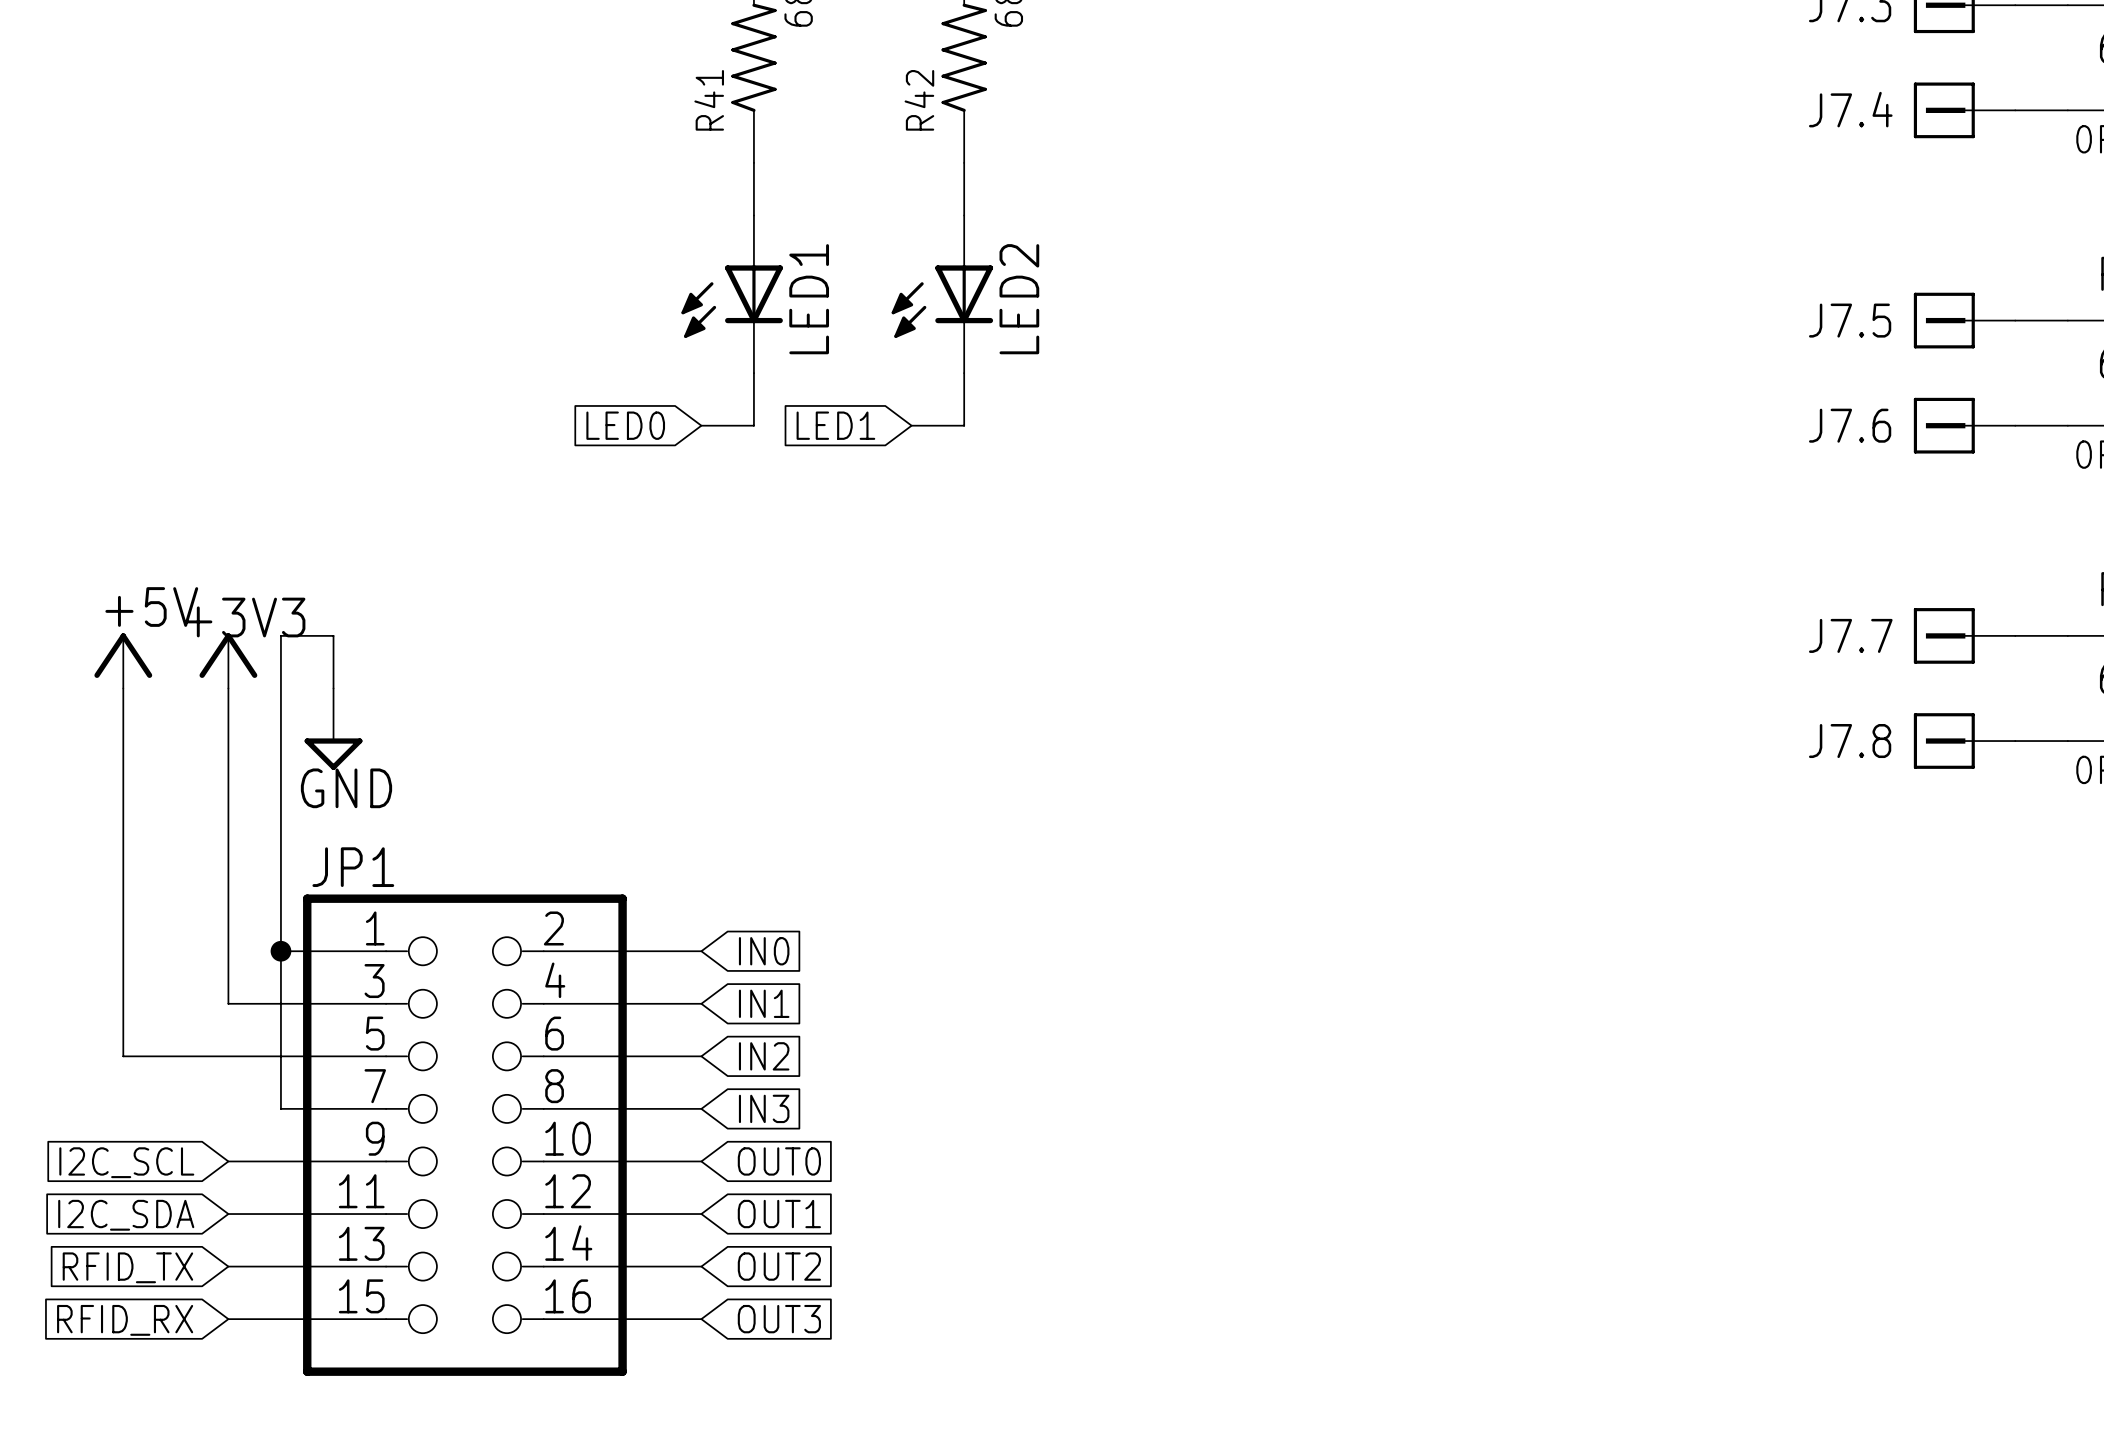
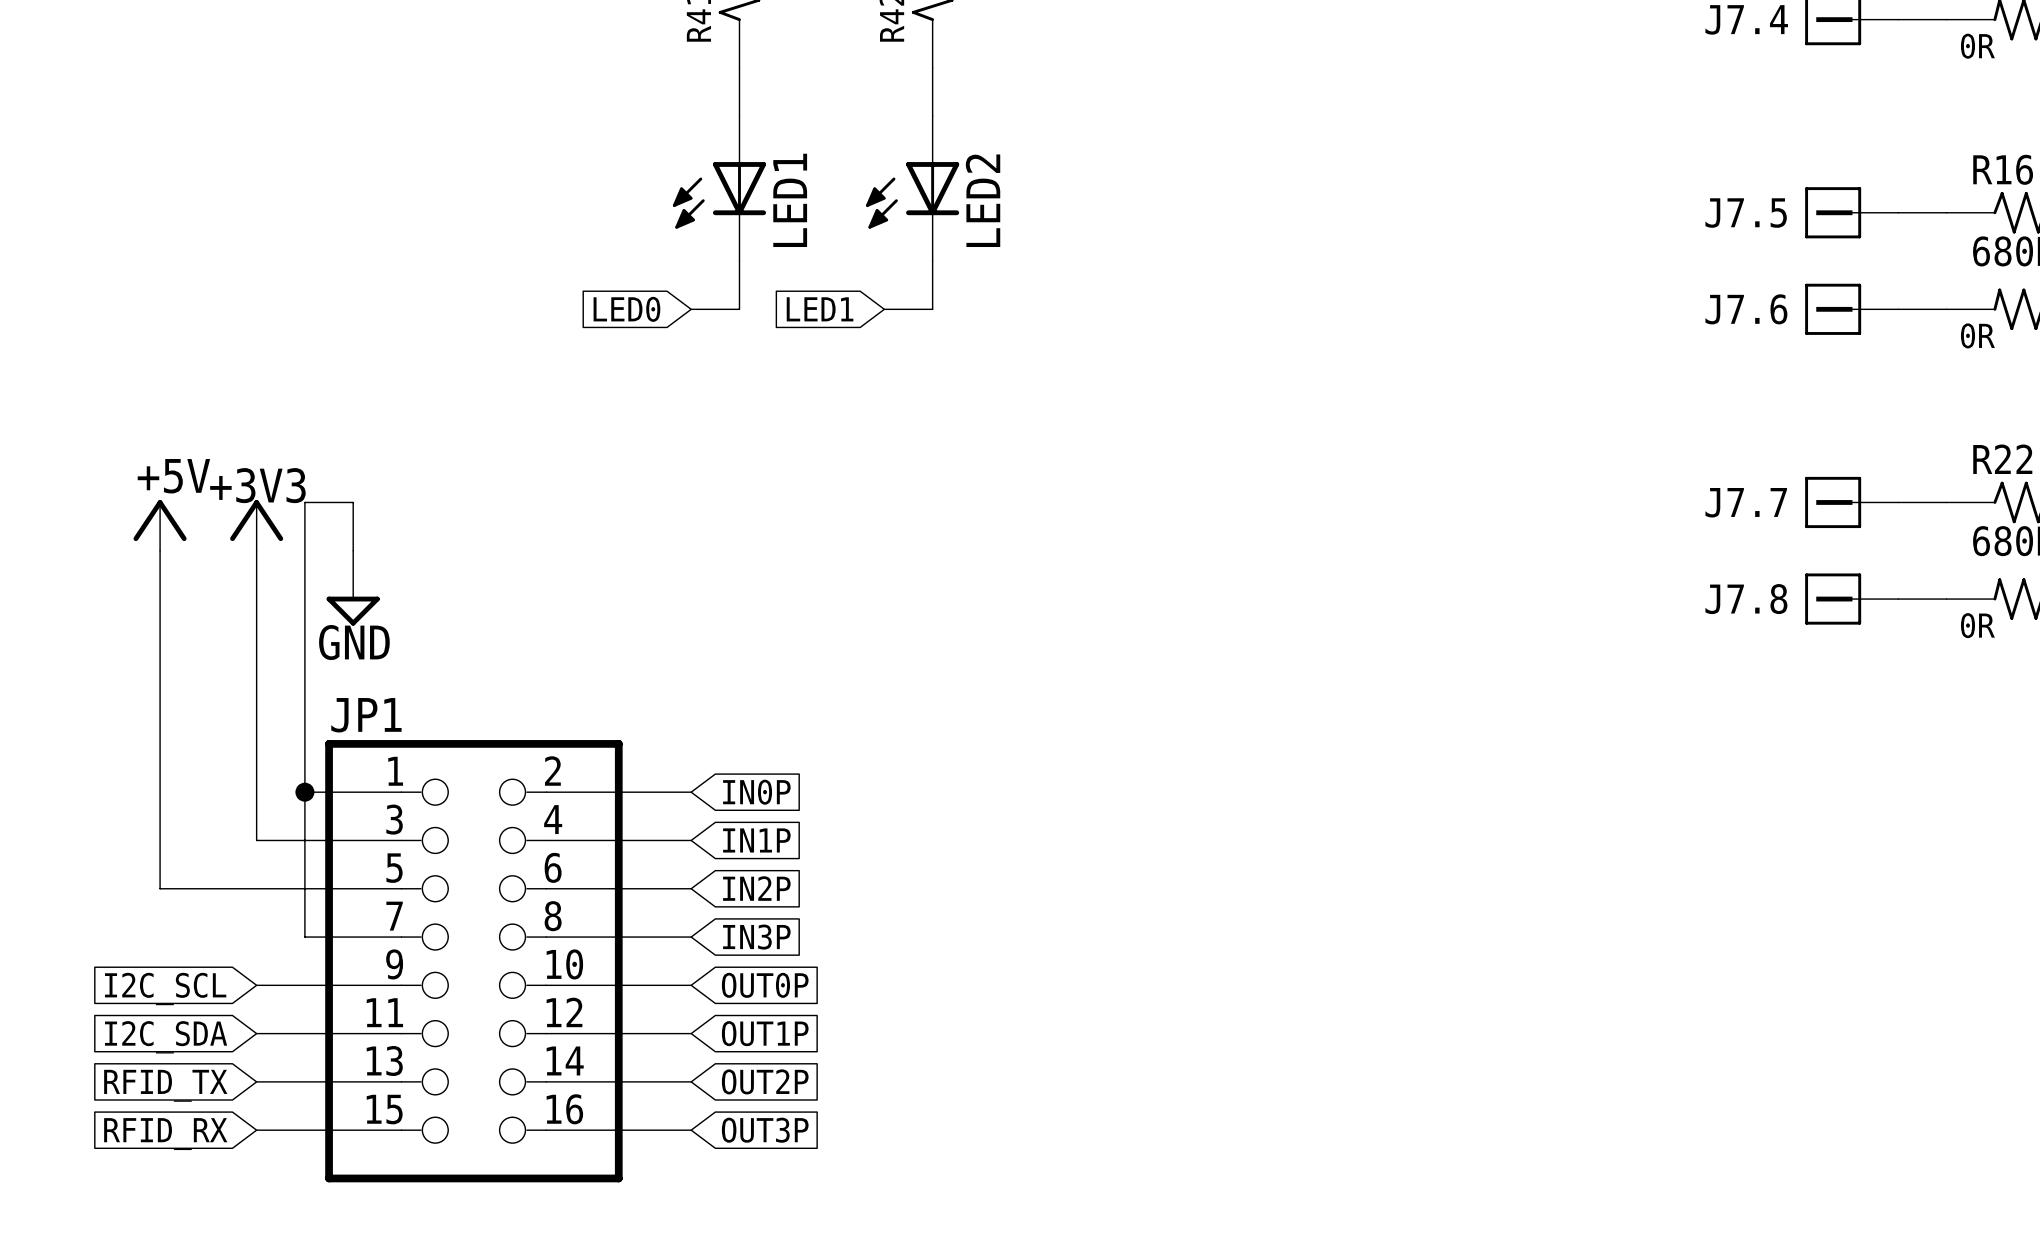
global label: IN0 (764, 951) -> IN0P (756, 792)
global label: IN1 (764, 1003) -> IN1P (756, 840)
global label: IN2 (764, 1056) -> IN2P (756, 888)
global label: IN3 (764, 1108) -> IN3P (756, 937)
global label: OUT0 (779, 1161) -> OUT0P (765, 985)
global label: OUT1 (779, 1214) -> OUT1P (765, 1033)
global label: OUT2 (779, 1266) -> OUT2P (765, 1081)
global label: OUT3 (779, 1319) -> OUT3P (765, 1130)

